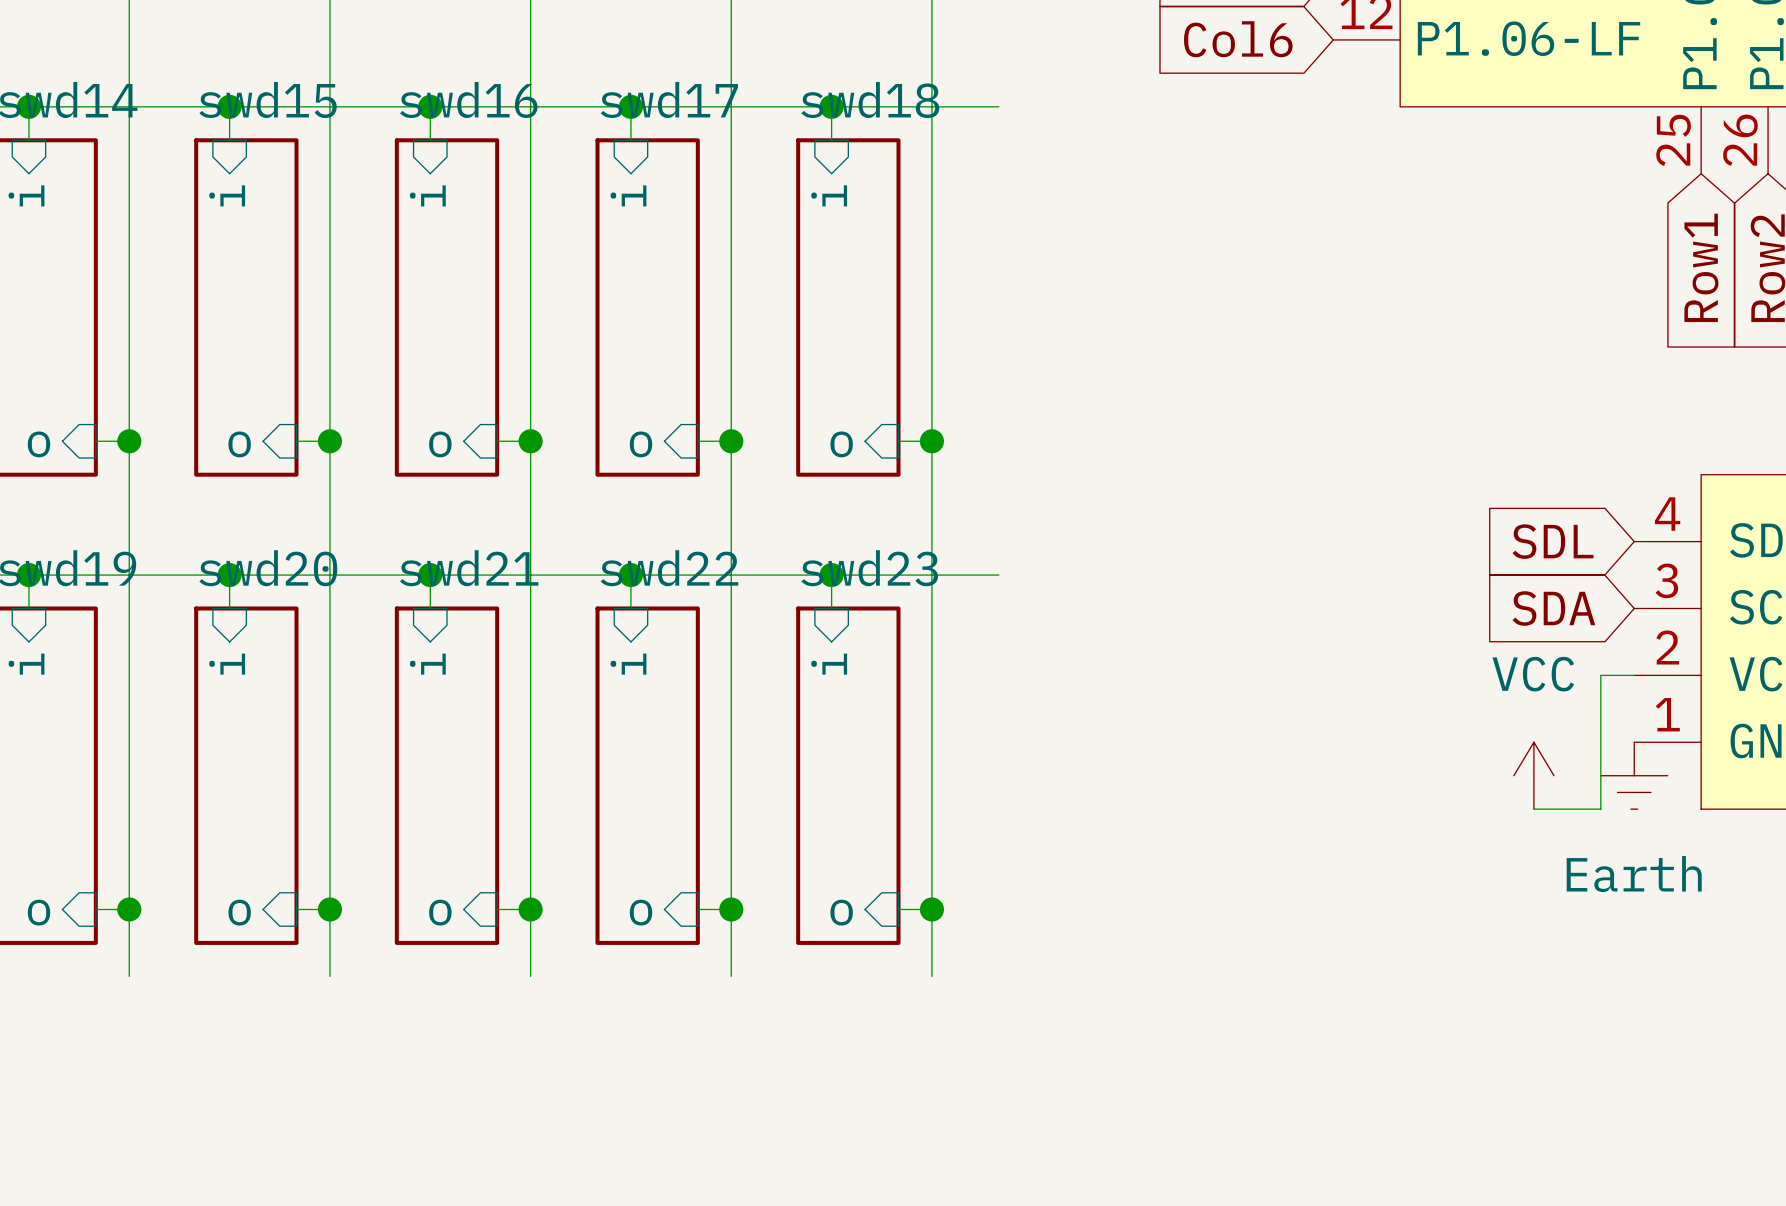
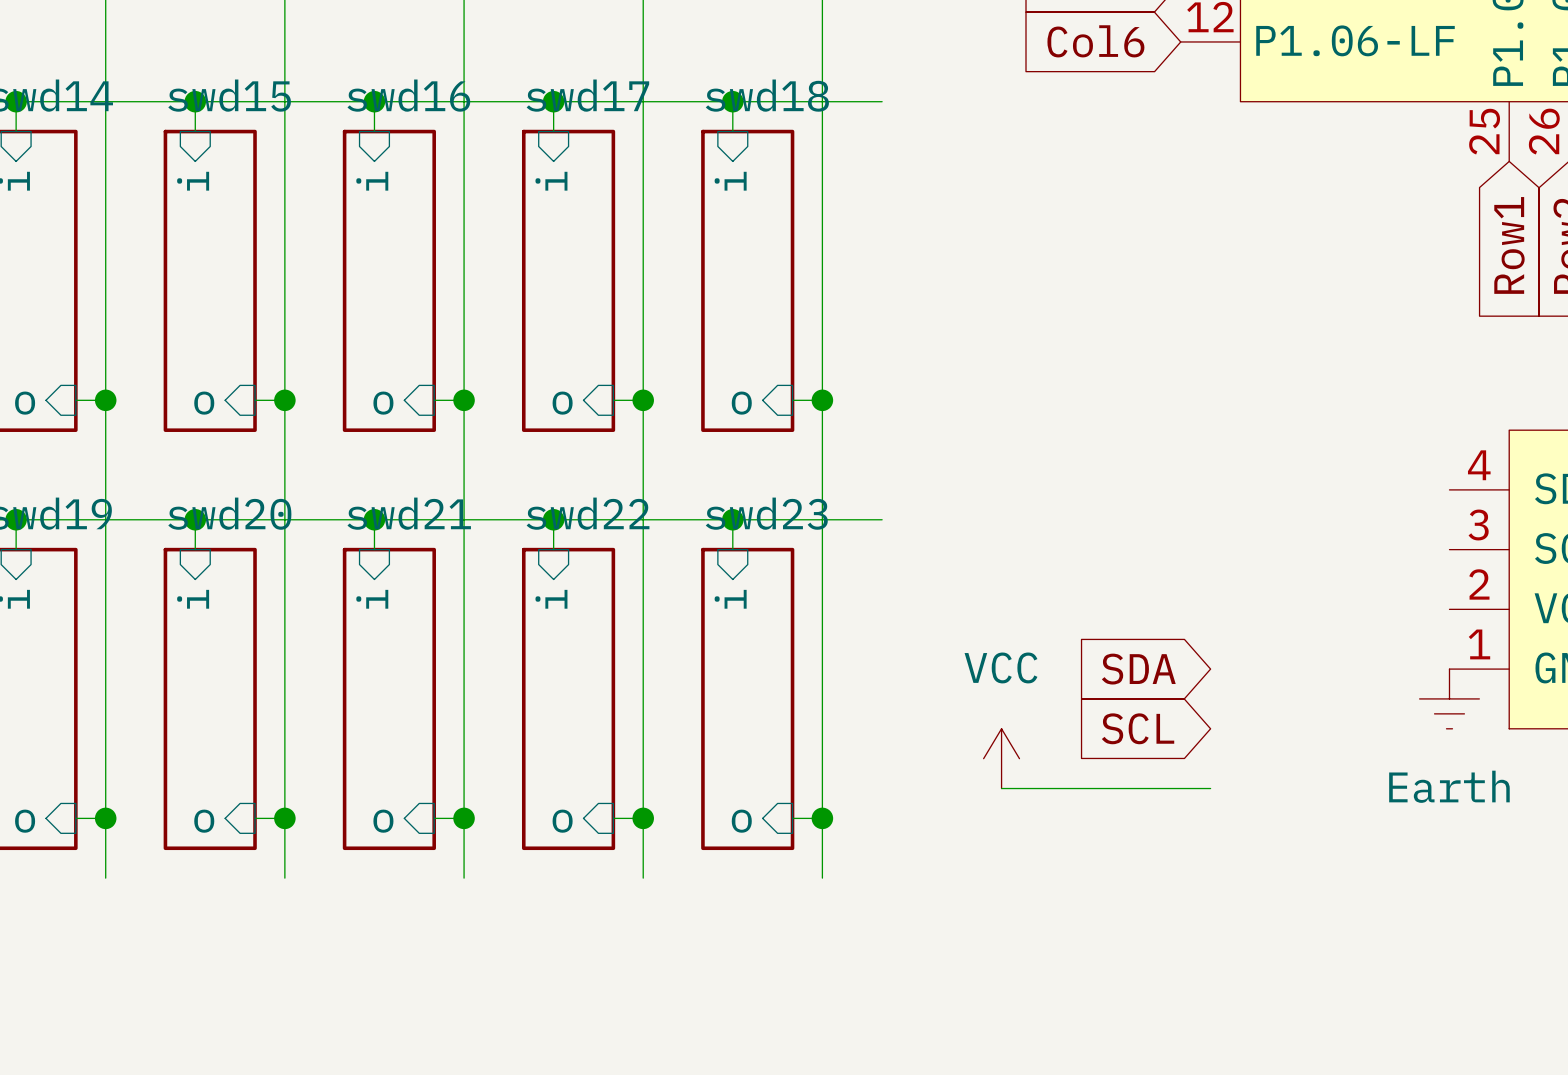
global label: SDL (1553, 541) -> none
global label position: SDA (1553, 608) -> SDA (1138, 669)
wire: (1634, 675) (1600, 675) (1600, 809) (1533, 809) -> none
power symbol position: VCC (1533, 775) -> VCC (1001, 758)
global label: none -> SCL (1138, 728)
wire: none -> (1001, 788) (1210, 788)

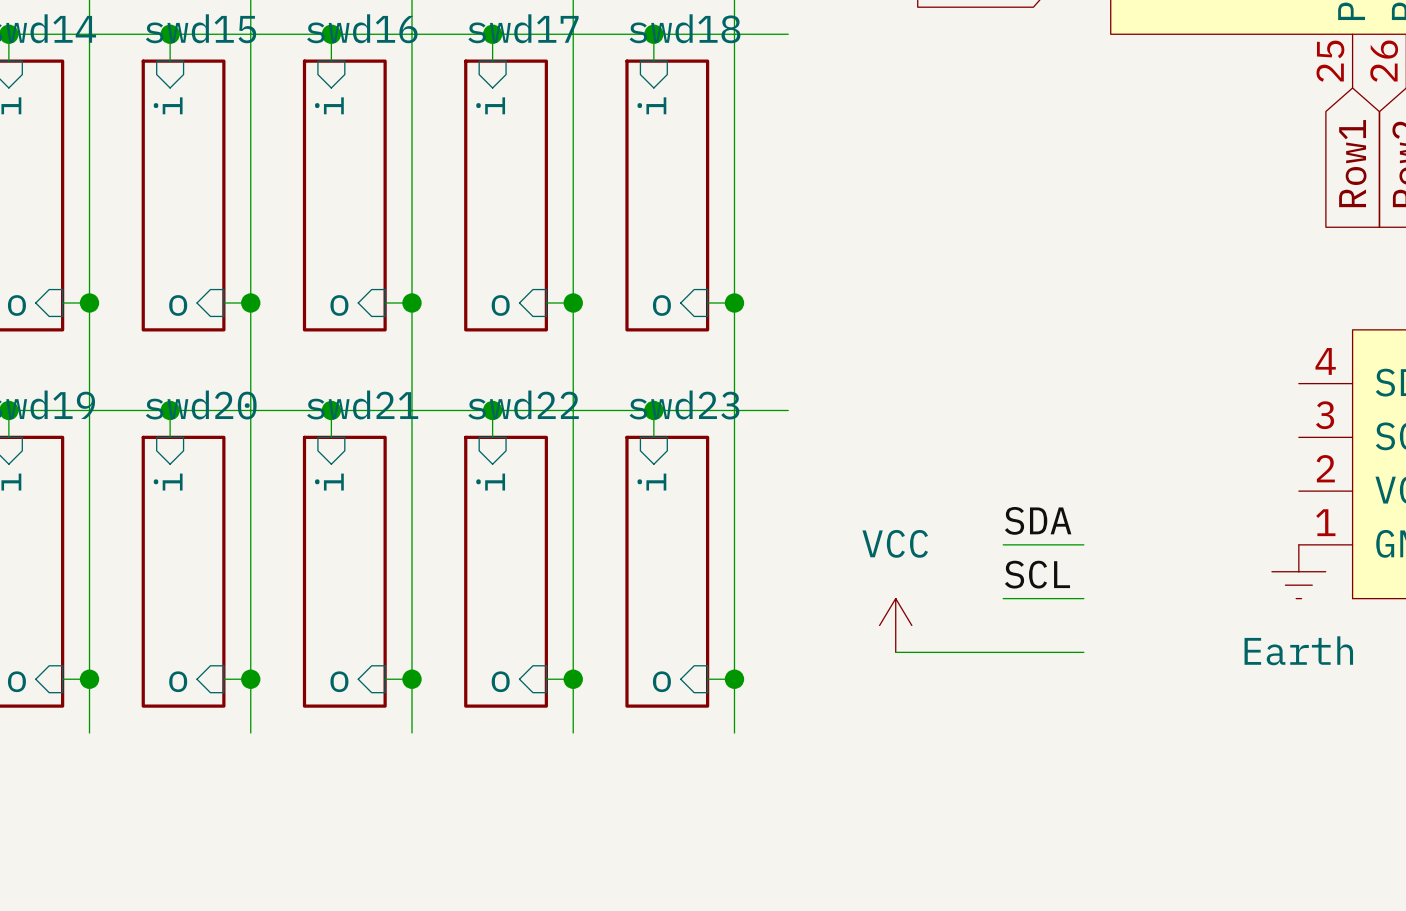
label: none -> SDA (1038, 520)
wire: none -> (1003, 544) (1083, 544)
global label: SDA (1138, 669) -> none
label: none -> SCL (1037, 574)
wire: none -> (1003, 598) (1083, 598)
global label: SCL (1138, 728) -> none

